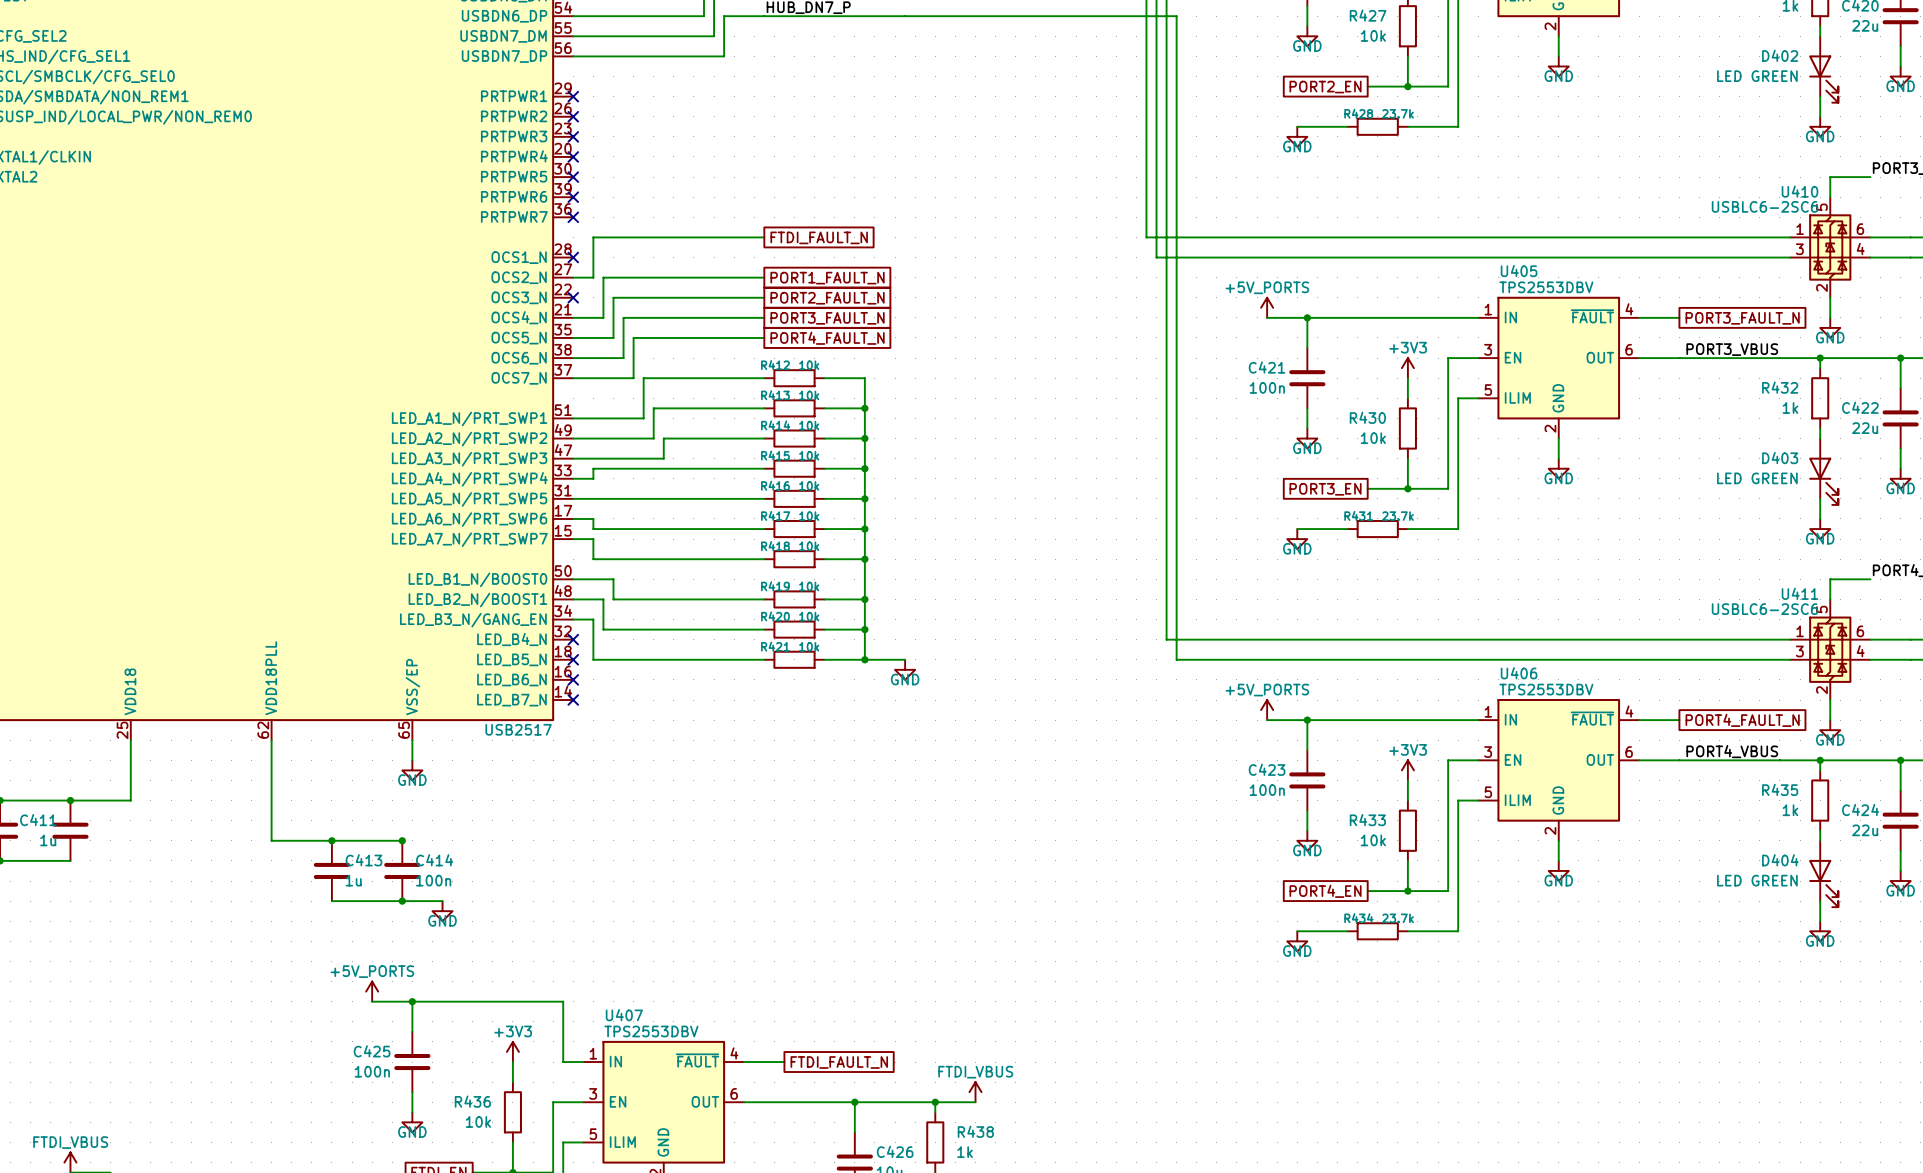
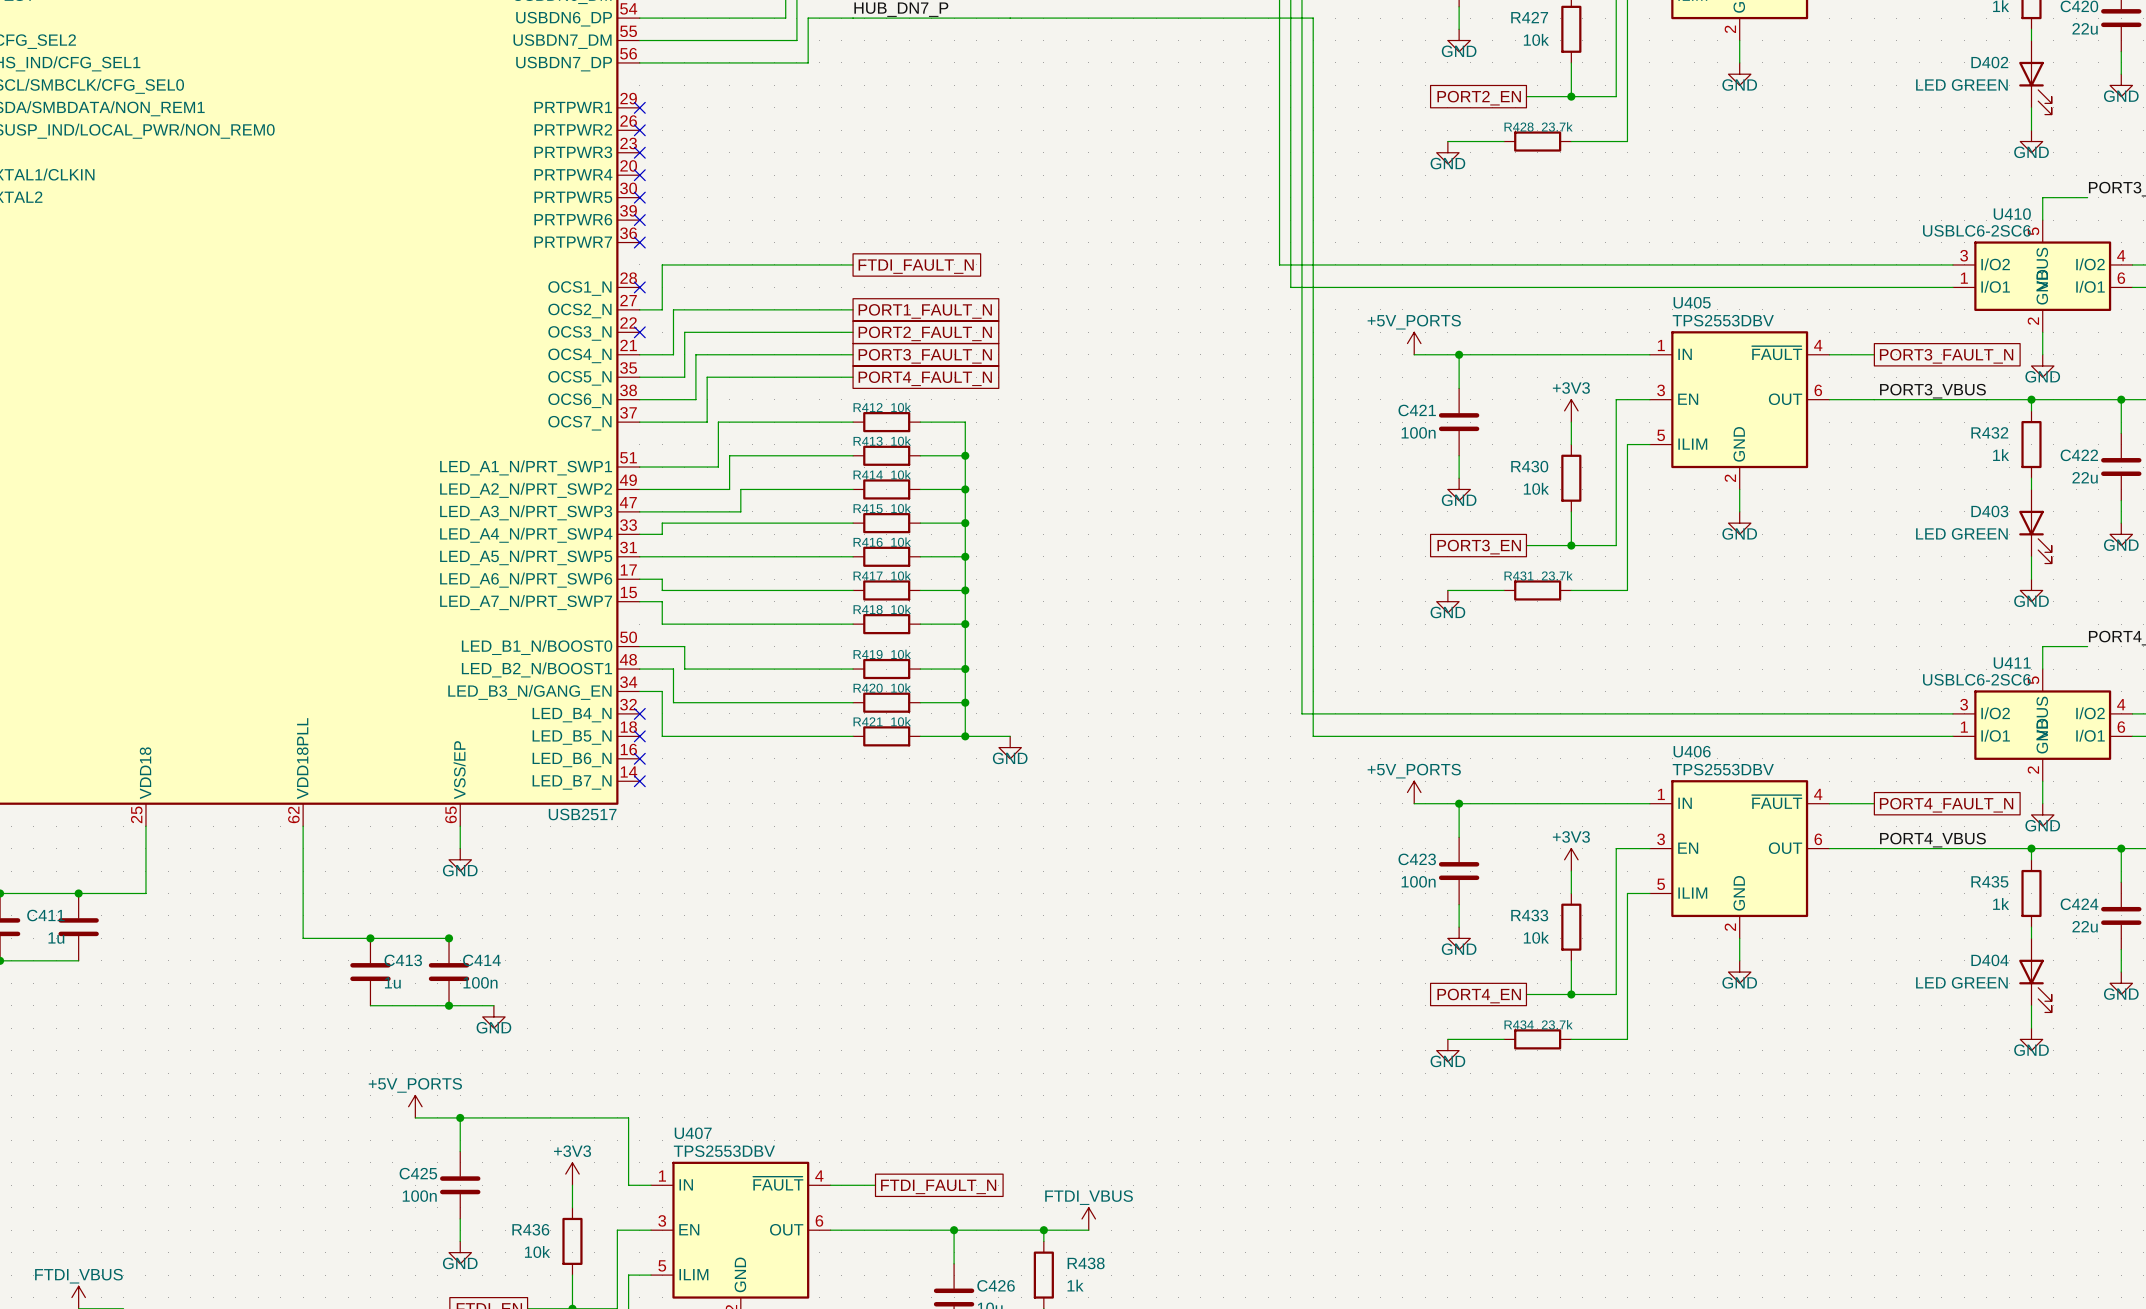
U410 symbol: [1790, 197, 1871, 298] -> [1952, 220, 2133, 333]
U411 symbol: [1790, 599, 1871, 701] -> [1952, 669, 2133, 782]

